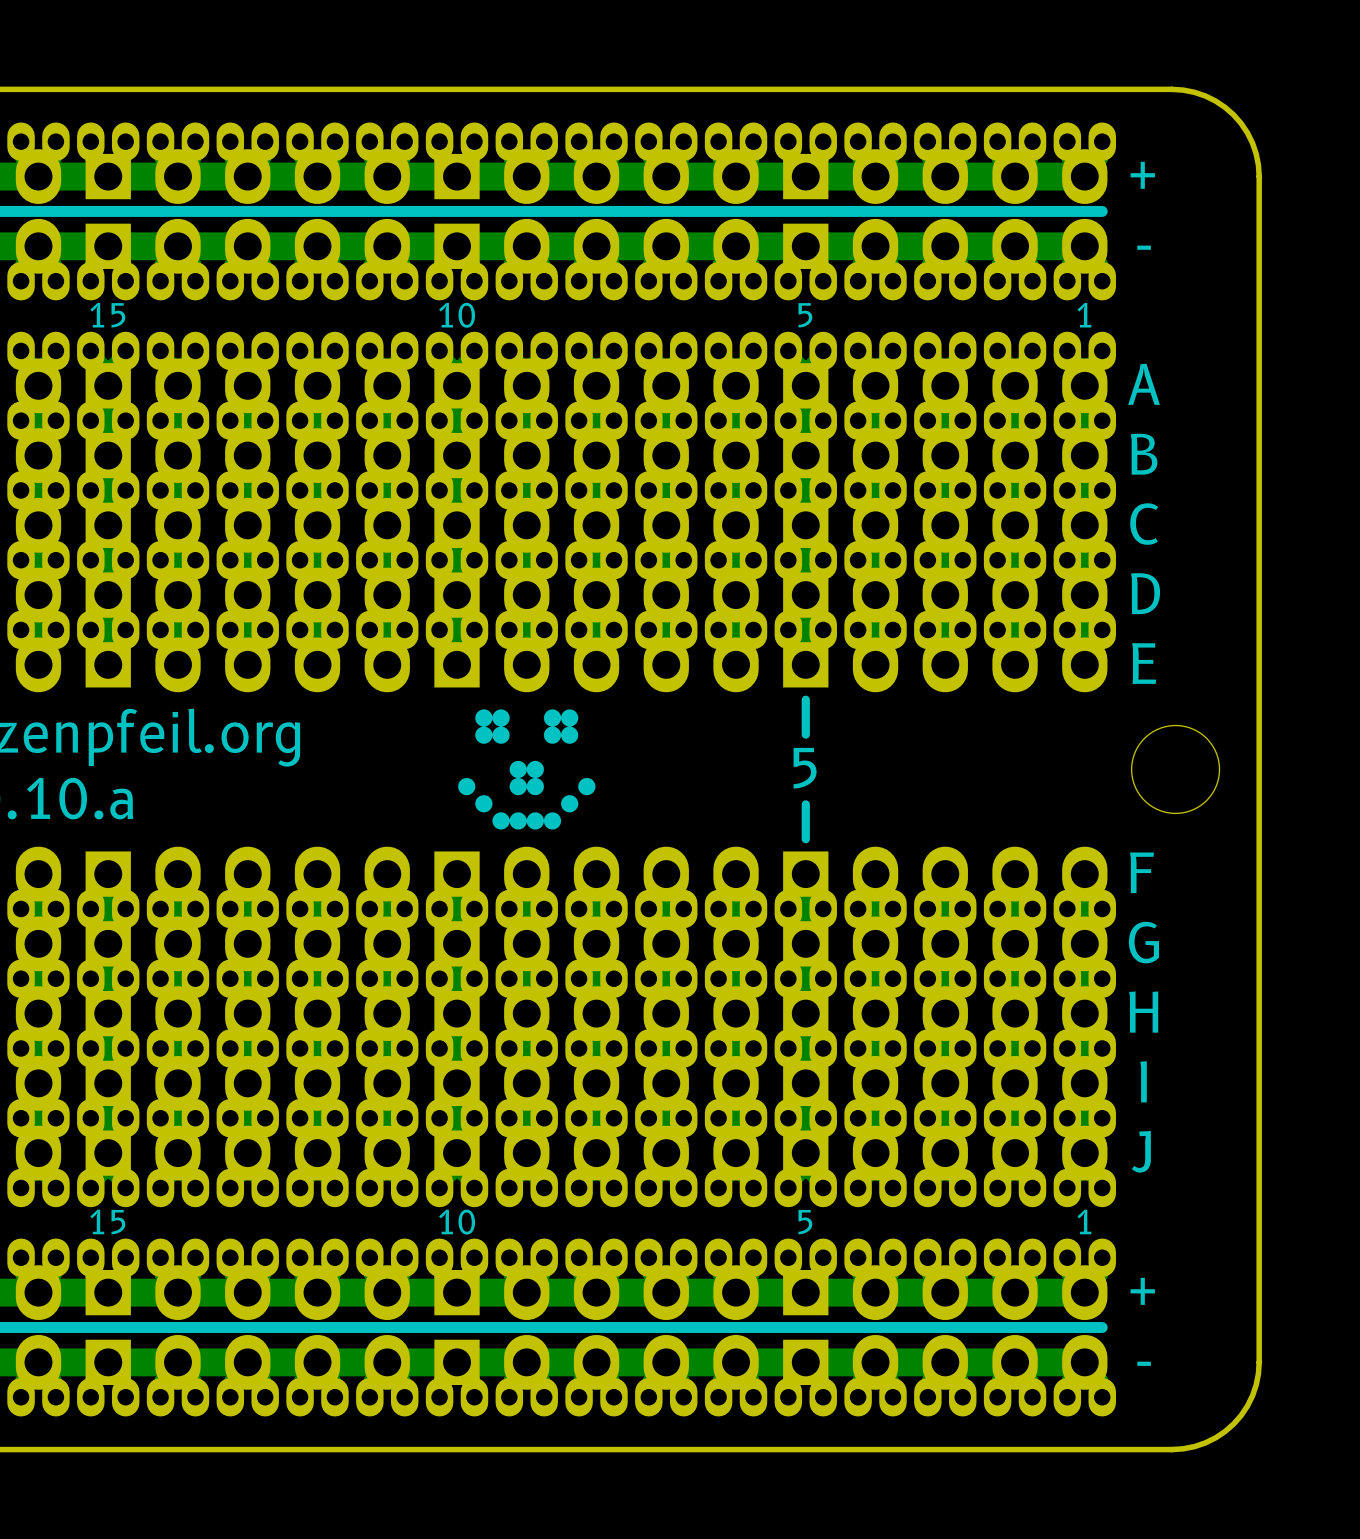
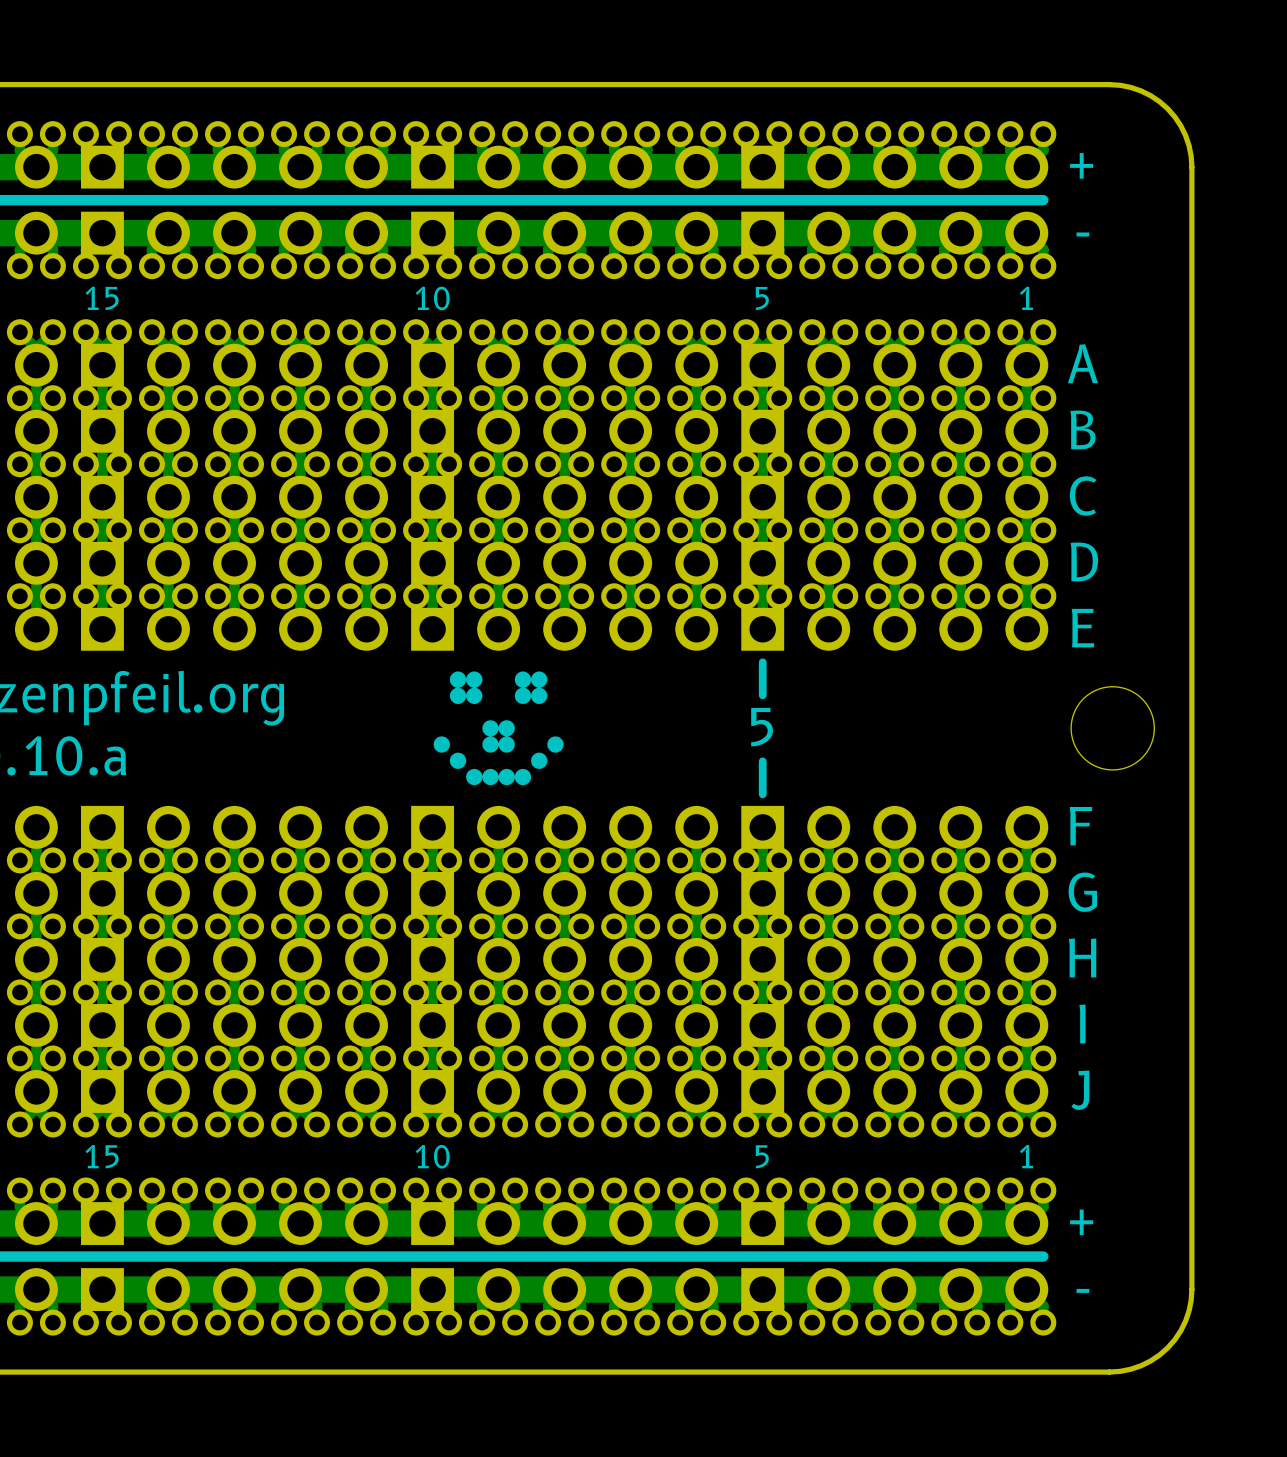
part footprint: [7, 122, 279, 161] -> [6, 121, 265, 148]
part footprint: [286, 122, 558, 161] -> [271, 121, 529, 148]
part footprint: [565, 122, 837, 161] -> [535, 121, 793, 148]
part footprint: [844, 122, 1116, 161] -> [799, 121, 1057, 148]
part footprint: [15, 149, 550, 205] -> [14, 145, 521, 189]
part footprint: [573, 149, 1108, 205] -> [543, 145, 1049, 189]
part footprint: [15, 218, 550, 274] -> [14, 211, 521, 255]
part footprint: [573, 218, 1108, 274] -> [543, 211, 1049, 255]
part footprint: [7, 261, 279, 301] -> [6, 253, 265, 280]
part footprint: [286, 261, 558, 301] -> [271, 253, 529, 280]
part footprint: [565, 261, 837, 301] -> [535, 253, 793, 280]
part footprint: [844, 261, 1116, 301] -> [799, 253, 1057, 280]
part footprint: [7, 331, 279, 371] -> [6, 319, 265, 346]
part footprint: [286, 331, 558, 371] -> [271, 319, 529, 346]
part footprint: [565, 331, 837, 371] -> [535, 319, 793, 346]
part footprint: [844, 331, 1116, 371] -> [799, 319, 1057, 346]
part footprint: [15, 358, 550, 414] -> [14, 343, 521, 387]
part footprint: [573, 358, 1108, 414] -> [543, 343, 1049, 387]
part footprint: [7, 401, 279, 440] -> [6, 385, 265, 412]
part footprint: [286, 401, 558, 440] -> [271, 385, 529, 412]
part footprint: [565, 401, 837, 440] -> [535, 385, 793, 412]
part footprint: [844, 401, 1116, 440] -> [799, 385, 1057, 412]
part footprint: [15, 428, 550, 484] -> [14, 409, 521, 453]
part footprint: [573, 428, 1108, 484] -> [543, 409, 1049, 453]
part footprint: [7, 471, 279, 510] -> [6, 451, 265, 478]
part footprint: [286, 471, 558, 510] -> [271, 451, 529, 478]
part footprint: [565, 471, 837, 510] -> [535, 451, 793, 478]
part footprint: [844, 471, 1116, 510] -> [799, 451, 1057, 478]
part footprint: [15, 497, 550, 553] -> [14, 475, 521, 519]
part footprint: [573, 497, 1108, 553] -> [543, 475, 1049, 519]
part footprint: [7, 540, 279, 580] -> [6, 517, 265, 544]
part footprint: [286, 540, 558, 580] -> [271, 517, 529, 544]
part footprint: [565, 540, 837, 580] -> [535, 517, 793, 544]
part footprint: [844, 540, 1116, 580] -> [799, 517, 1057, 544]
part footprint: [15, 567, 550, 623] -> [14, 541, 521, 585]
part footprint: [573, 567, 1108, 623] -> [543, 541, 1049, 585]
part footprint: [7, 610, 279, 650] -> [6, 583, 265, 610]
part footprint: [286, 610, 558, 650] -> [271, 583, 529, 610]
part footprint: [565, 610, 837, 650] -> [535, 583, 793, 610]
part footprint: [844, 610, 1116, 650] -> [799, 583, 1057, 610]
part footprint: [15, 637, 550, 693] -> [14, 607, 521, 651]
part footprint: [573, 637, 1108, 693] -> [543, 607, 1049, 651]
part footprint: [15, 846, 550, 902] -> [14, 805, 521, 849]
part footprint: [573, 846, 1108, 902] -> [543, 805, 1049, 849]
part footprint: [7, 889, 279, 929] -> [6, 847, 265, 874]
part footprint: [286, 889, 558, 929] -> [271, 847, 529, 874]
part footprint: [565, 889, 837, 929] -> [535, 847, 793, 874]
part footprint: [844, 889, 1116, 929] -> [799, 847, 1057, 874]
part footprint: [15, 916, 550, 972] -> [14, 871, 521, 915]
part footprint: [573, 916, 1108, 972] -> [543, 871, 1049, 915]
part footprint: [7, 959, 279, 998] -> [6, 913, 265, 940]
part footprint: [286, 959, 558, 998] -> [271, 913, 529, 940]
part footprint: [565, 959, 837, 998] -> [535, 913, 793, 940]
part footprint: [844, 959, 1116, 998] -> [799, 913, 1057, 940]
part footprint: [15, 986, 550, 1042] -> [14, 937, 521, 981]
part footprint: [573, 986, 1108, 1042] -> [543, 937, 1049, 981]
part footprint: [7, 1029, 279, 1068] -> [6, 979, 265, 1006]
part footprint: [286, 1029, 558, 1068] -> [271, 979, 529, 1006]
part footprint: [565, 1029, 837, 1068] -> [535, 979, 793, 1006]
part footprint: [844, 1029, 1116, 1068] -> [799, 979, 1057, 1006]
part footprint: [15, 1055, 550, 1111] -> [14, 1004, 521, 1047]
part footprint: [573, 1055, 1108, 1111] -> [543, 1004, 1049, 1047]
part footprint: [7, 1099, 279, 1138] -> [6, 1045, 265, 1072]
part footprint: [286, 1099, 558, 1138] -> [271, 1045, 529, 1072]
part footprint: [565, 1099, 837, 1138] -> [535, 1045, 793, 1072]
part footprint: [844, 1099, 1116, 1138] -> [799, 1045, 1057, 1072]
part footprint: [15, 1125, 550, 1181] -> [14, 1070, 521, 1113]
part footprint: [573, 1125, 1108, 1181] -> [543, 1070, 1049, 1113]
part footprint: [7, 1168, 279, 1208] -> [6, 1111, 265, 1138]
part footprint: [286, 1168, 558, 1208] -> [271, 1111, 529, 1138]
part footprint: [565, 1168, 837, 1208] -> [535, 1111, 793, 1138]
part footprint: [844, 1168, 1116, 1208] -> [799, 1111, 1057, 1138]
part footprint: [7, 1238, 279, 1277] -> [6, 1177, 265, 1204]
part footprint: [286, 1238, 558, 1277] -> [271, 1177, 529, 1204]
part footprint: [565, 1238, 837, 1277] -> [535, 1177, 793, 1204]
part footprint: [844, 1238, 1116, 1277] -> [799, 1177, 1057, 1204]
part footprint: [15, 1265, 550, 1321] -> [14, 1202, 521, 1245]
part footprint: [573, 1265, 1108, 1321] -> [543, 1202, 1049, 1245]
part footprint: [15, 1334, 550, 1390] -> [14, 1268, 521, 1312]
part footprint: [573, 1334, 1108, 1390] -> [543, 1268, 1049, 1312]
part footprint: [7, 1378, 279, 1417] -> [6, 1309, 265, 1336]
part footprint: [286, 1378, 558, 1417] -> [271, 1309, 529, 1336]
part footprint: [565, 1378, 837, 1417] -> [535, 1309, 793, 1336]
part footprint: [844, 1378, 1116, 1417] -> [799, 1309, 1057, 1336]

